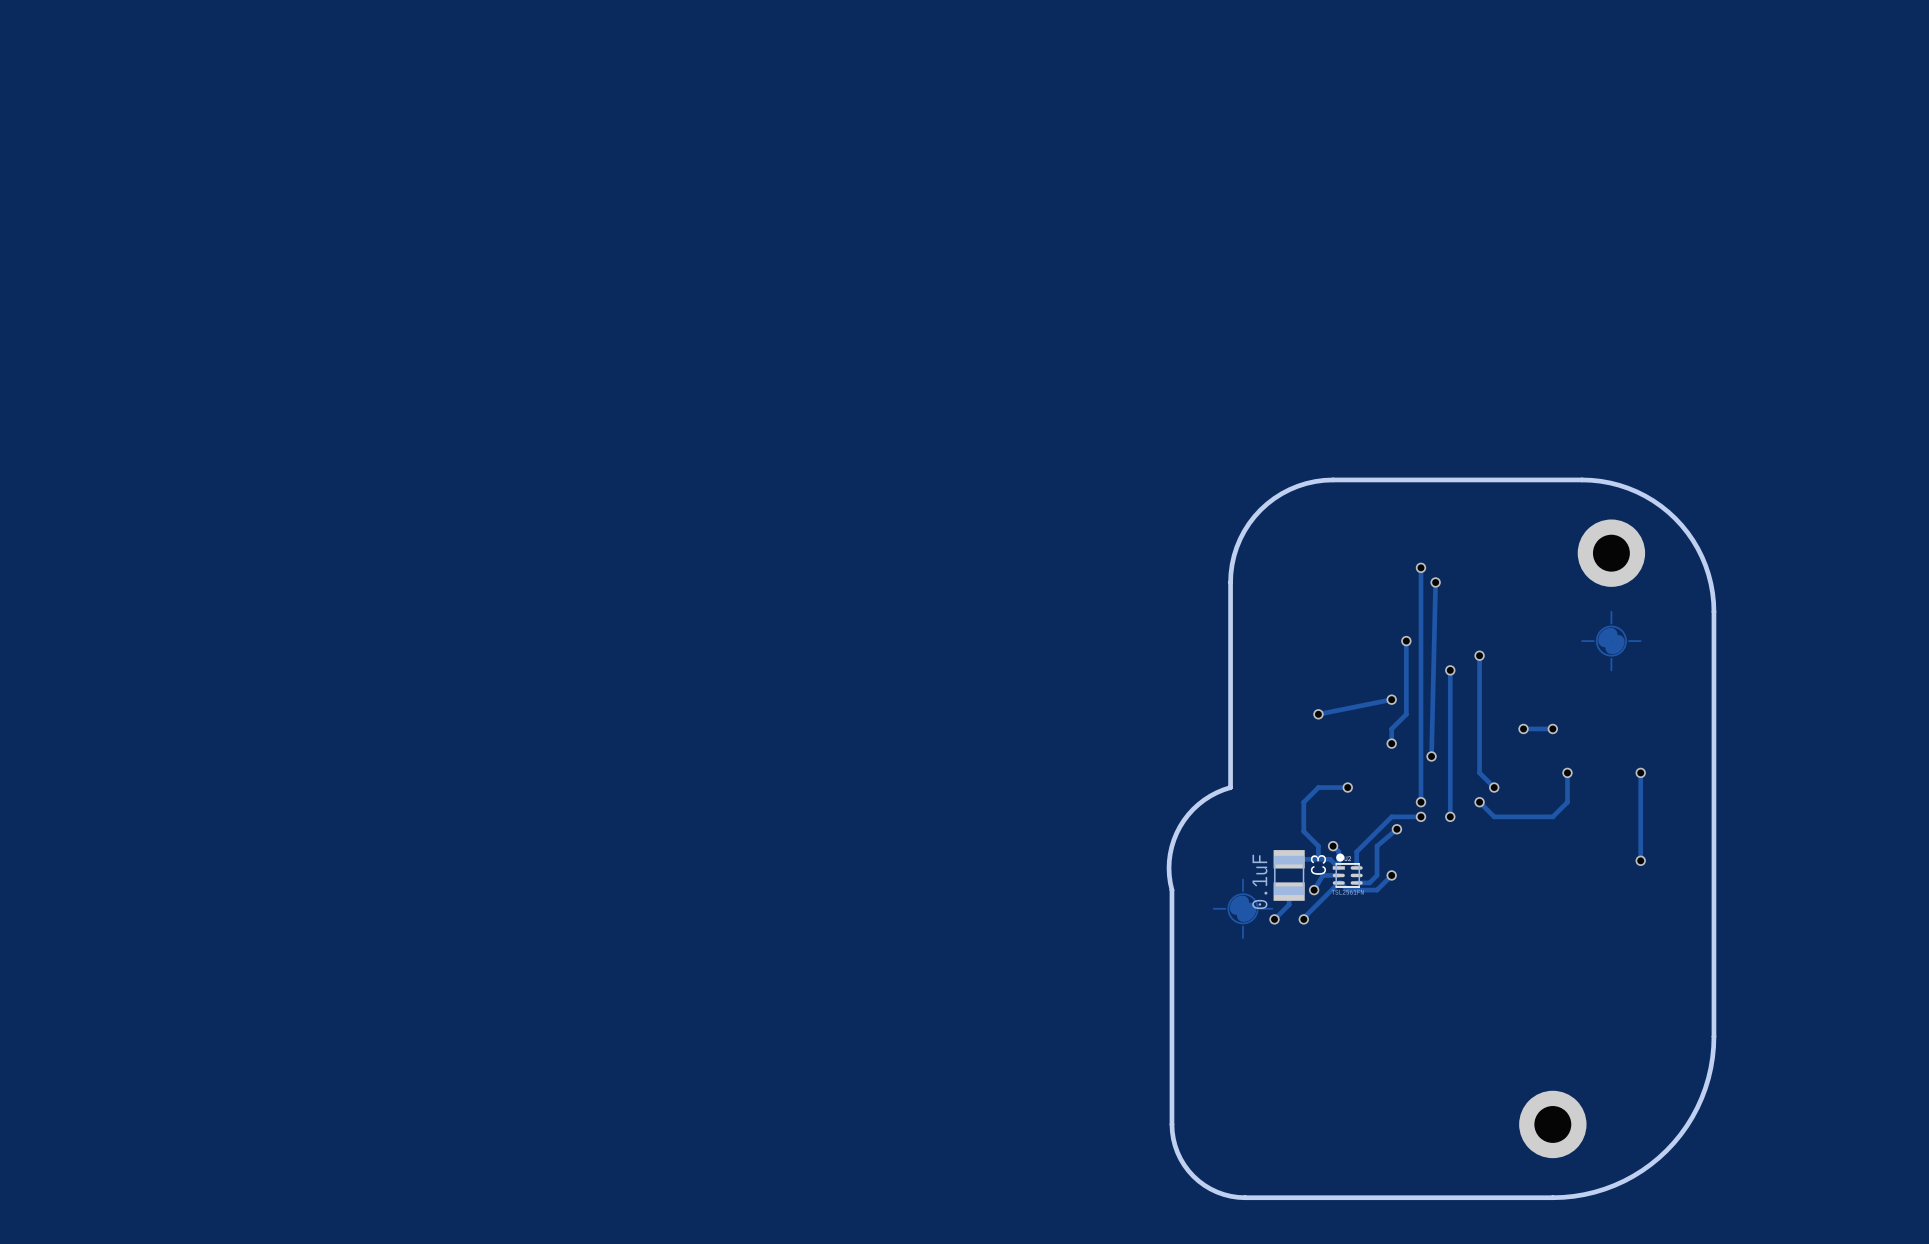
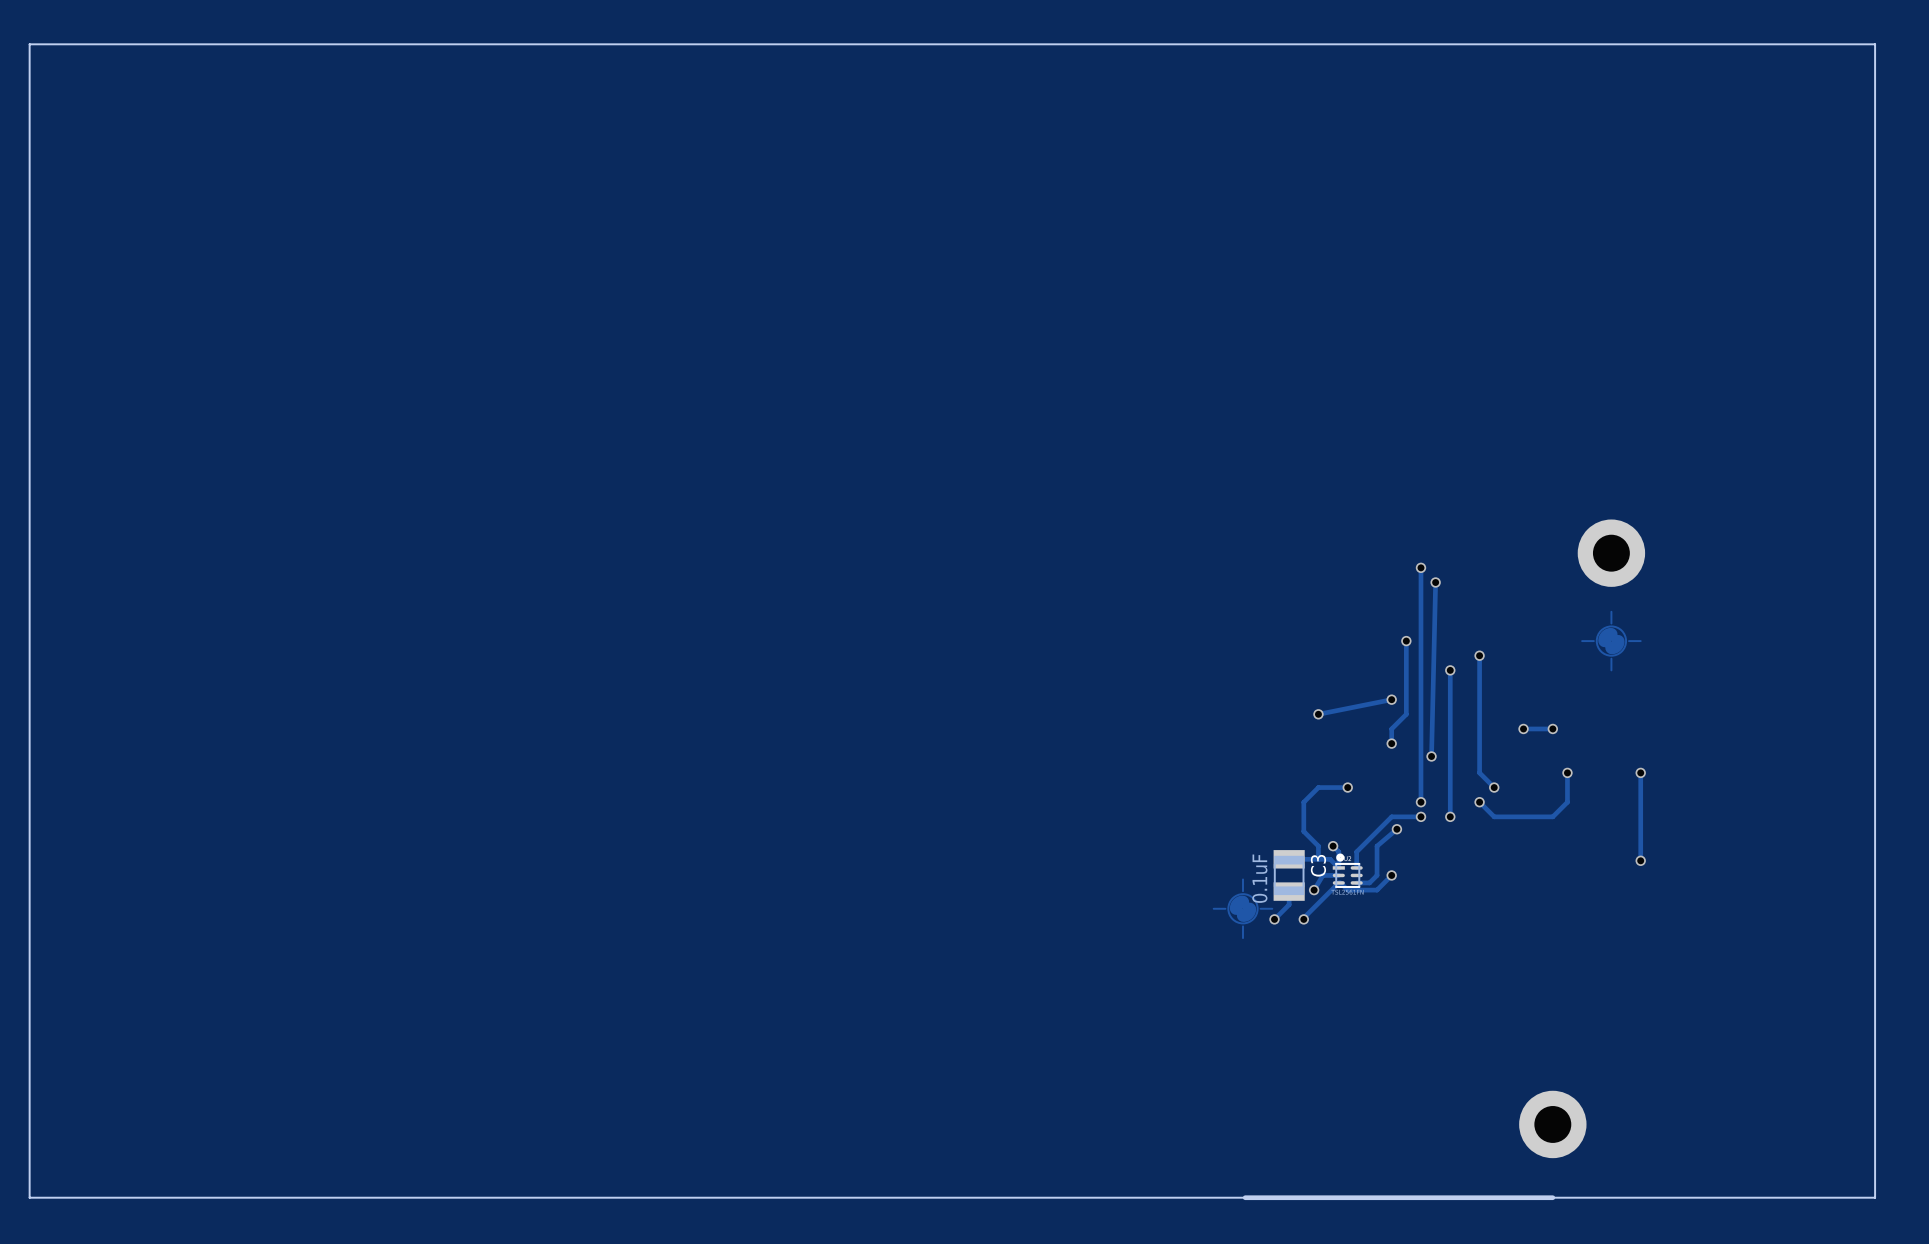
board edge: (1552, 1197) (1584, 1194) (1614, 1185) (1633, 1176) (1659, 1157) (1680, 1134) (1697, 1107) (1708, 1078) (1713, 1047) (1713, 611) (1710, 583) (1697, 548) (1681, 525) (1668, 512) (1636, 491) (1610, 482) (1591, 480) (1315, 481) (1298, 486) (1274, 498) (1254, 516) (1240, 539) (1234, 555) (1230, 582) (1230, 787) (1204, 799) (1183, 820) (1171, 846) (1169, 868) (1171, 890) (1173, 1138) (1180, 1158) (1198, 1181) (1223, 1194) (1245, 1197) -> (1552, 1197) (1875, 1197) (1875, 44) (29, 44) (29, 1197) (1245, 1197)

